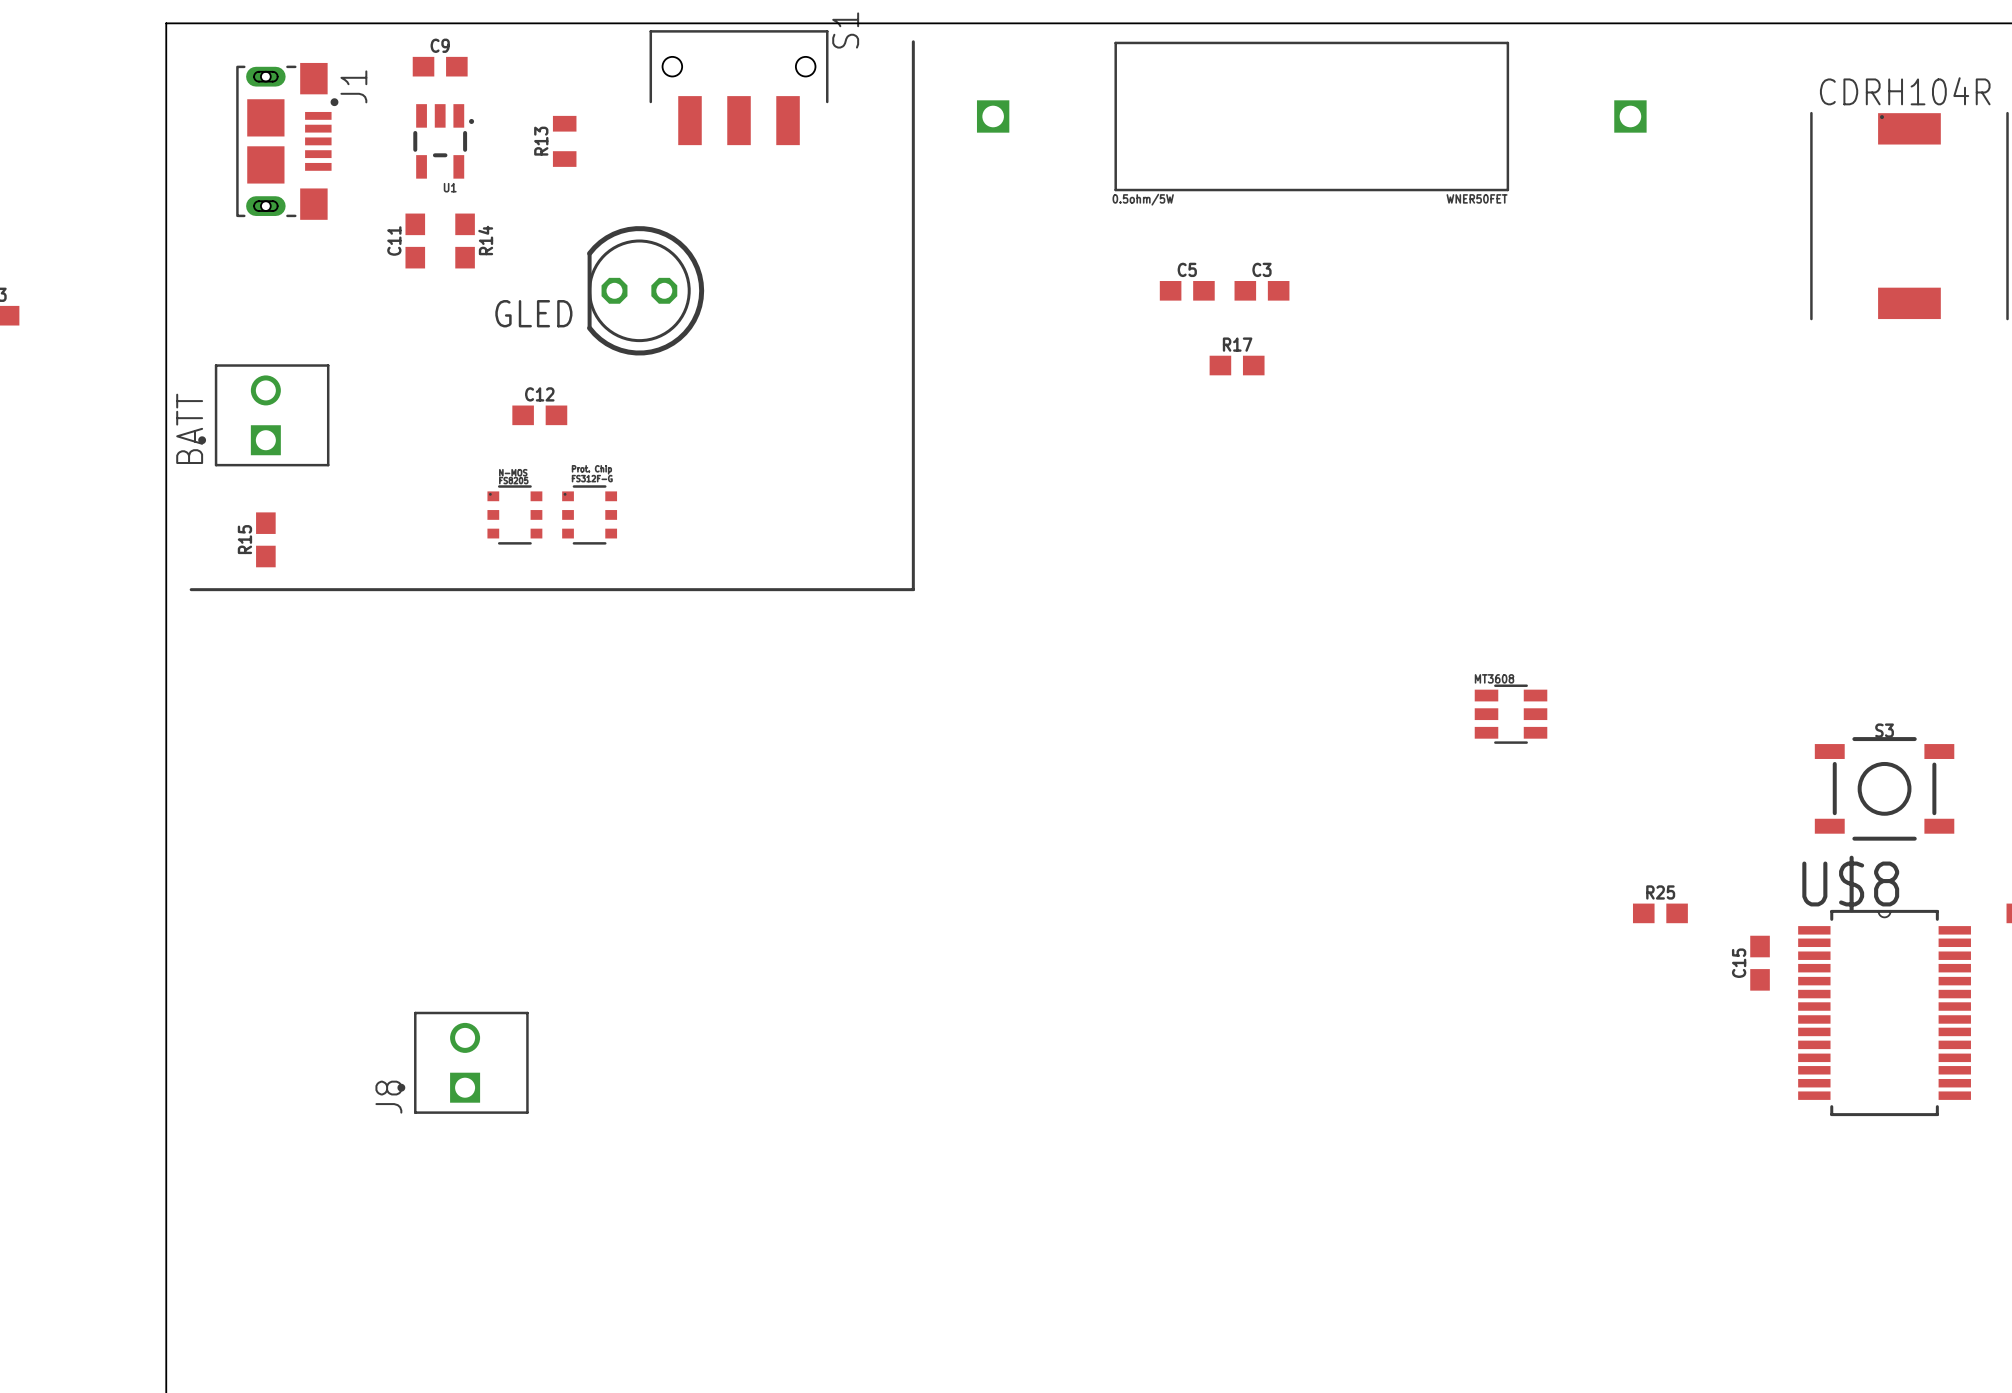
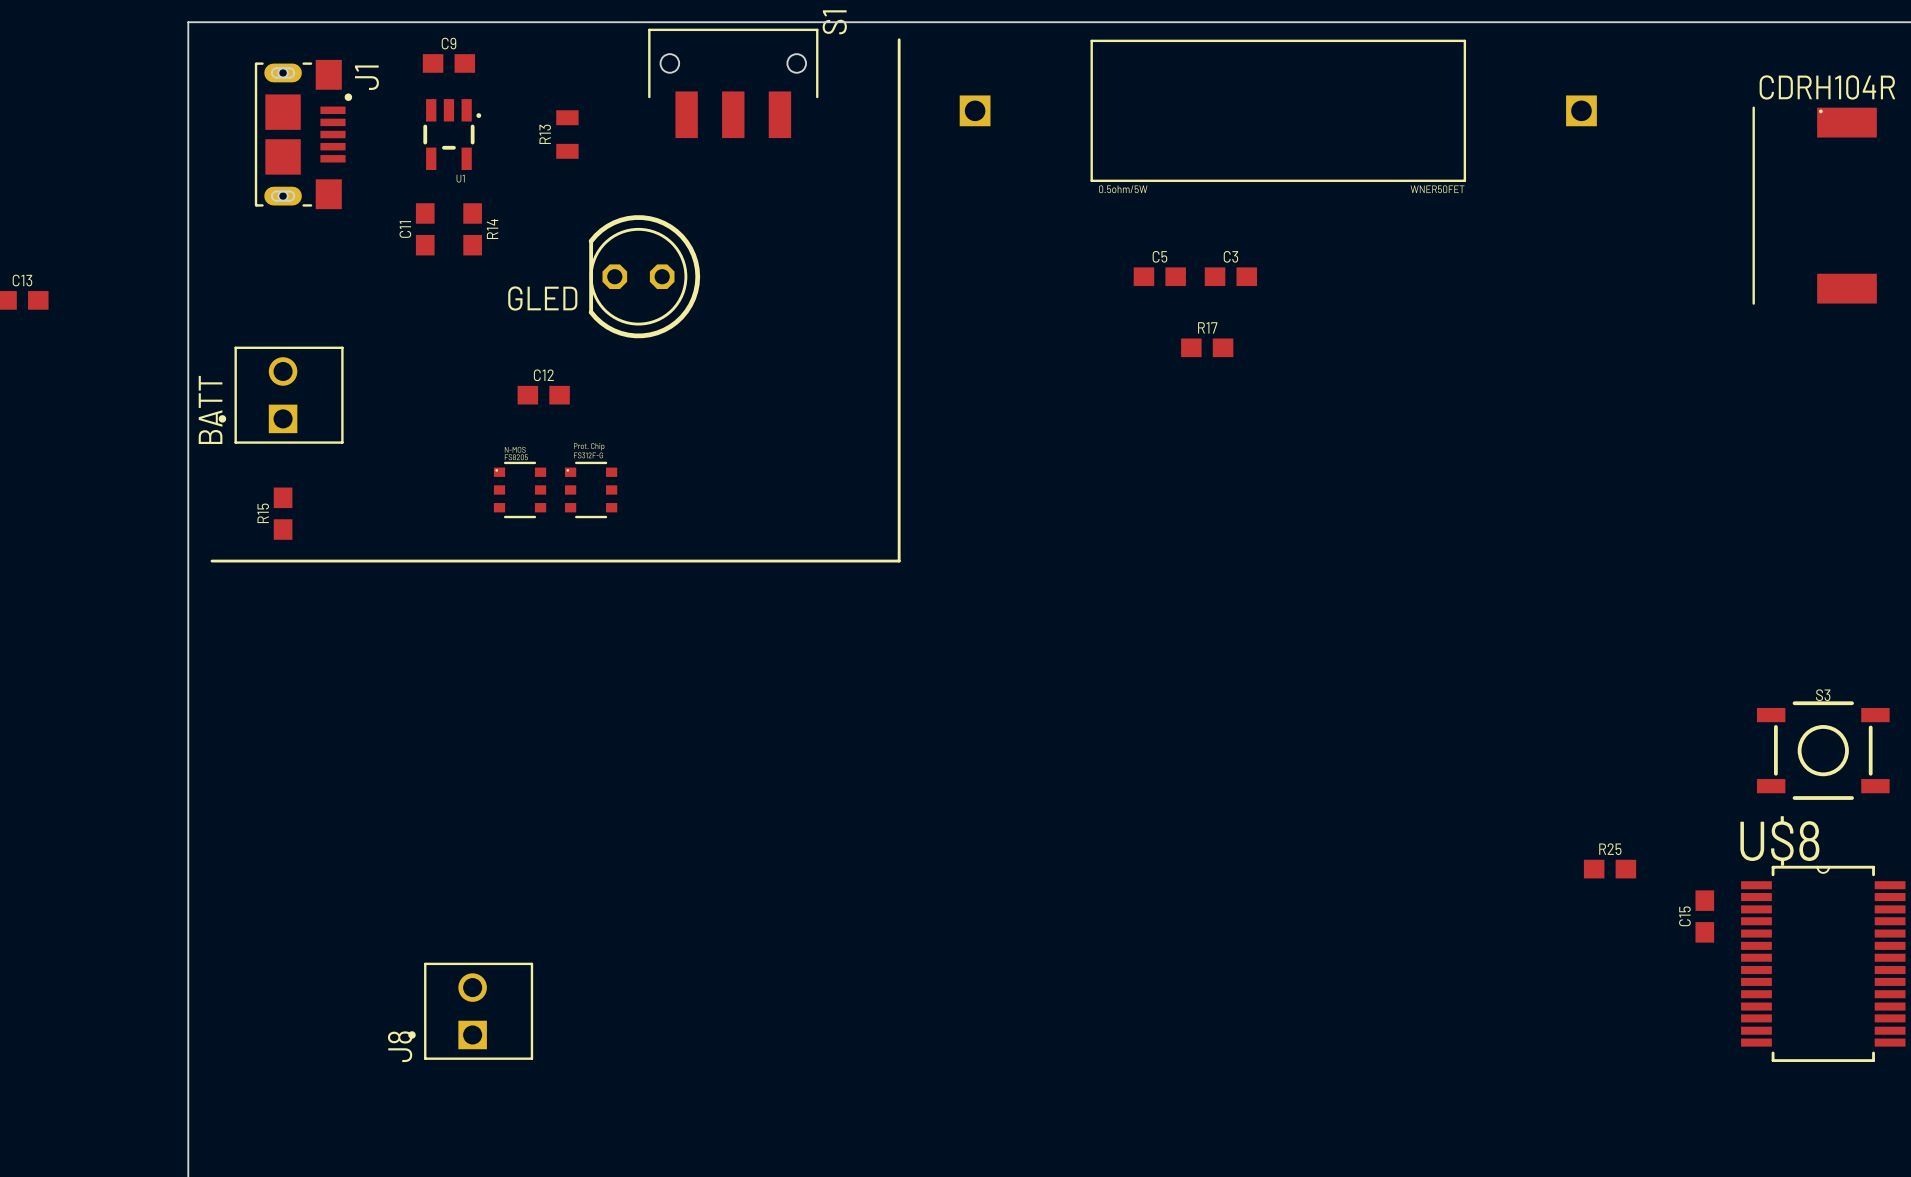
part: (1511, 714) -> none

